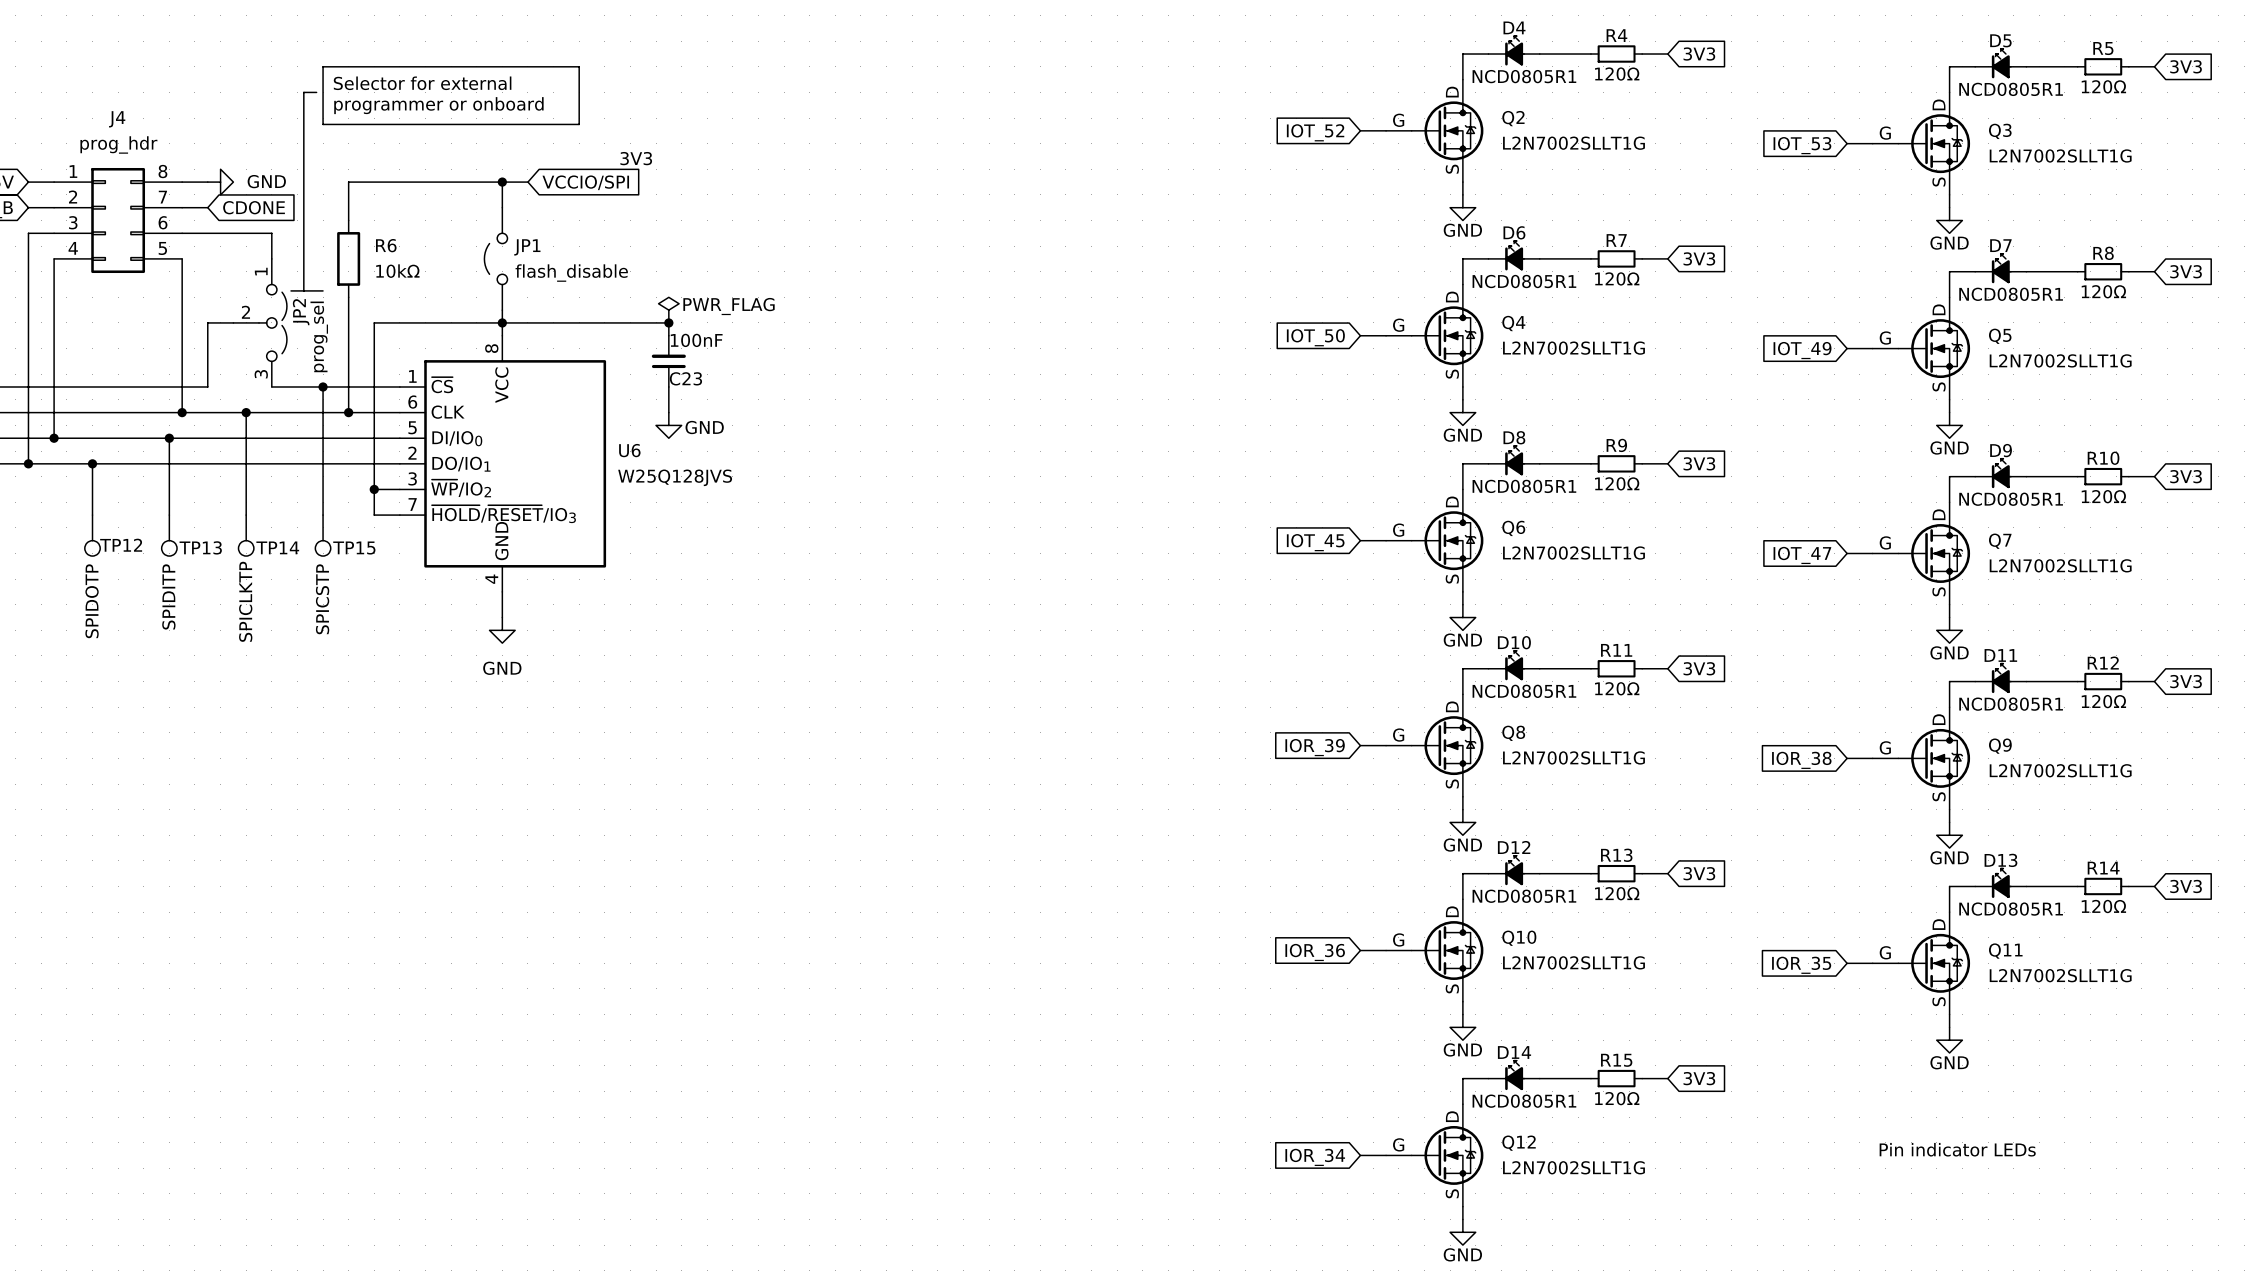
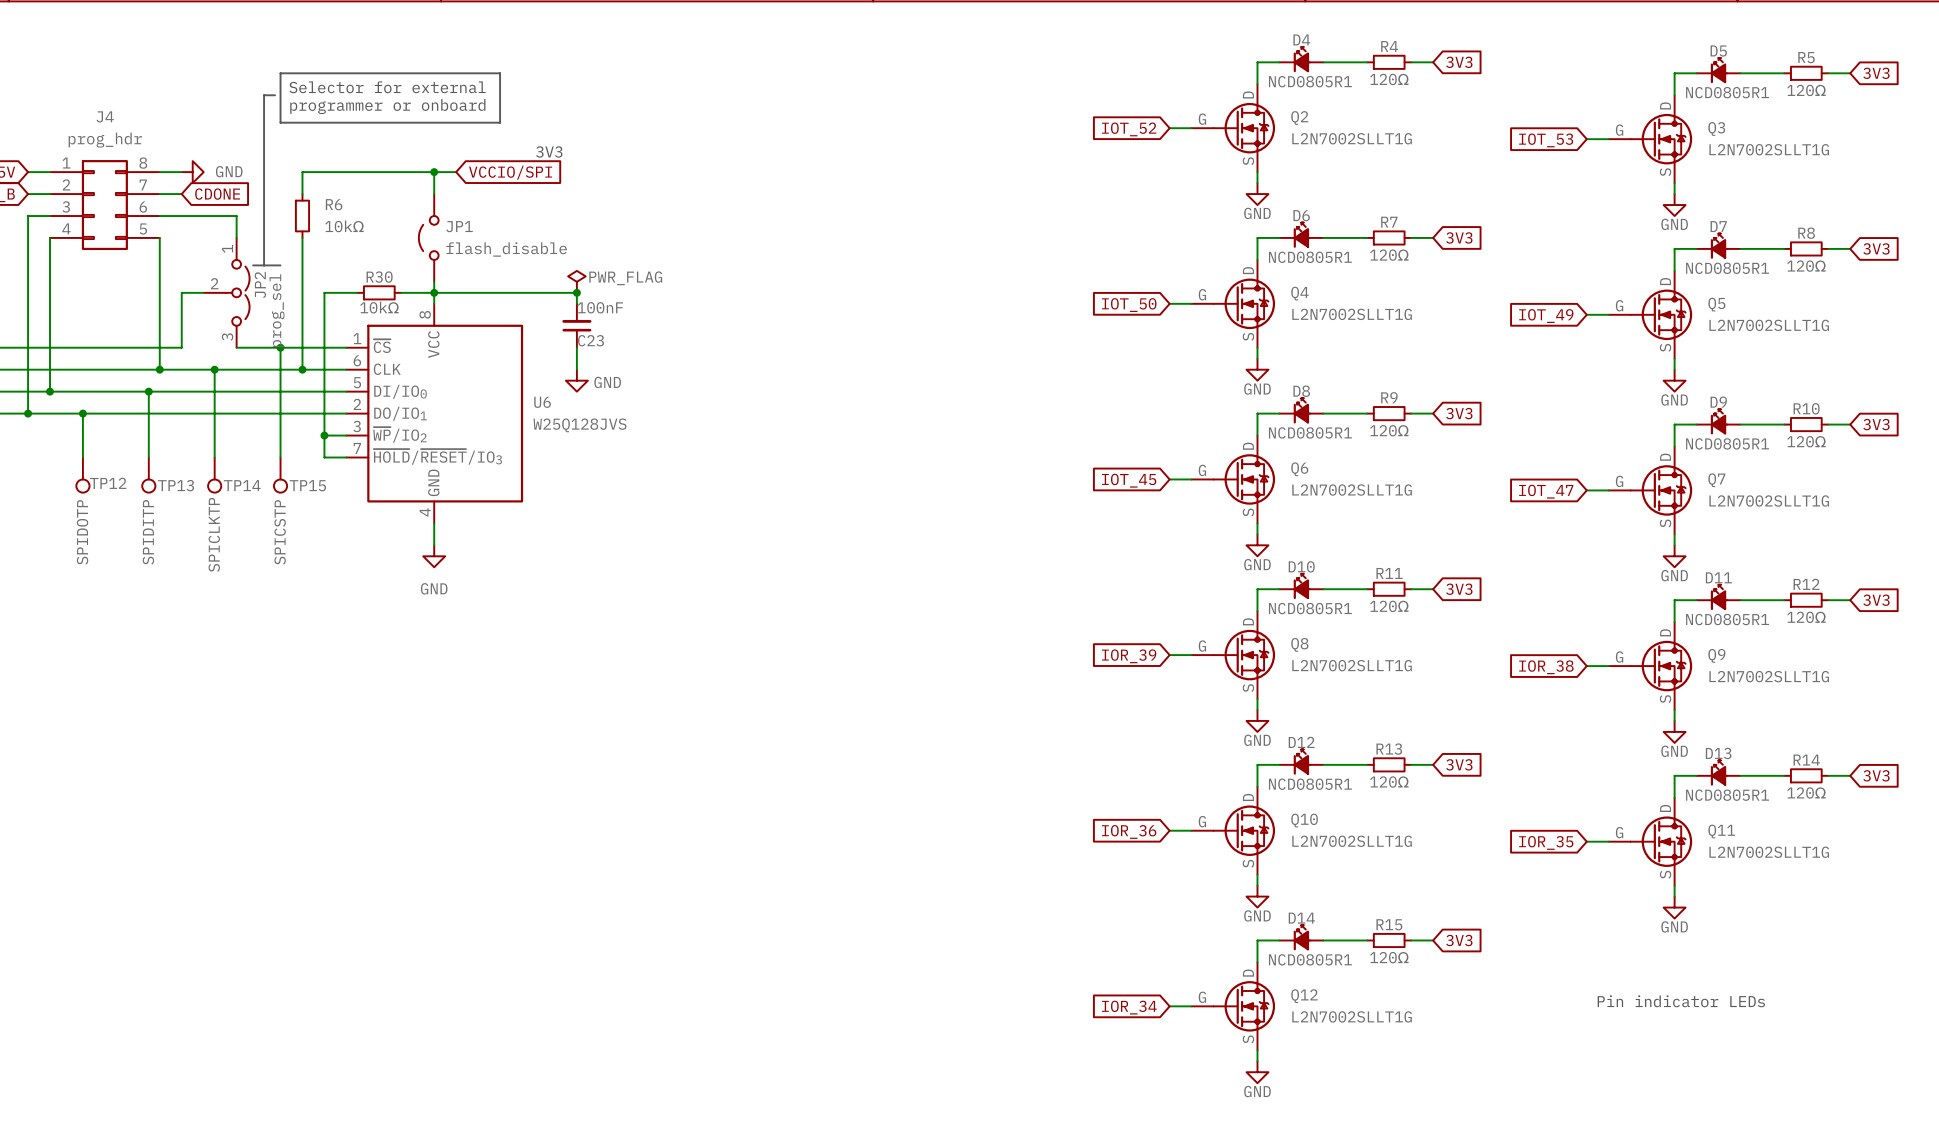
R6 symbol: [337, 220, 361, 298] -> [295, 194, 310, 238]
wire: none -> (302, 237) (302, 270)
wire: (412, 322) (463, 322) -> none
R30: none -> 10kΩ (379, 292)

